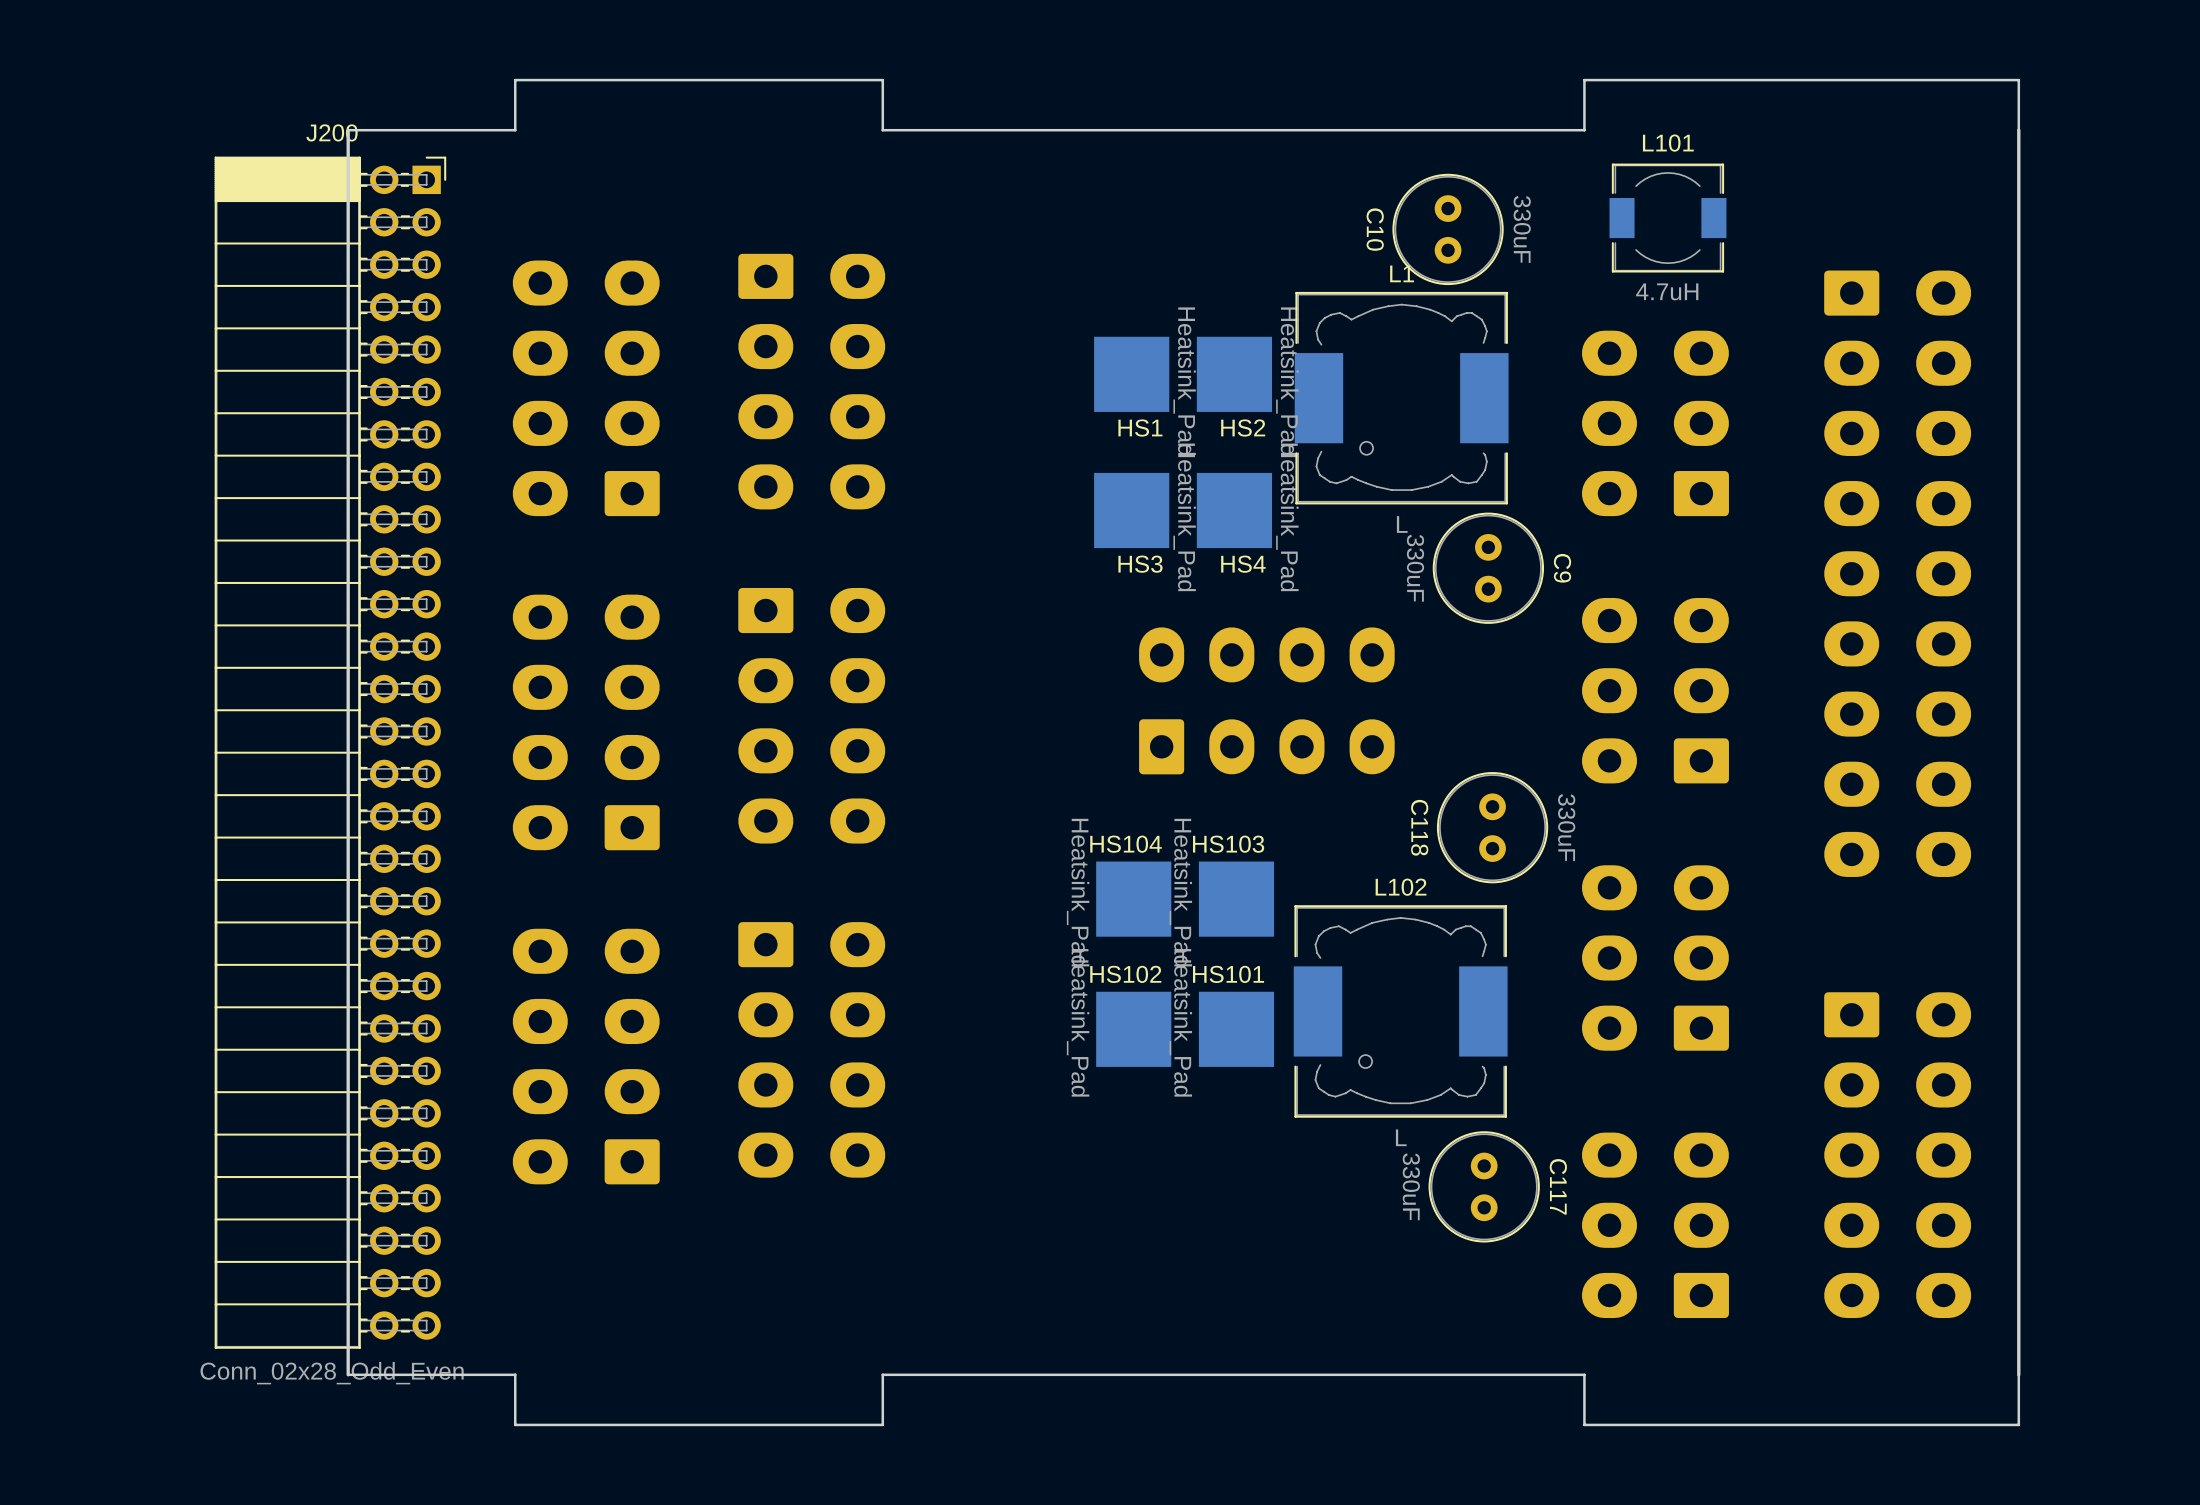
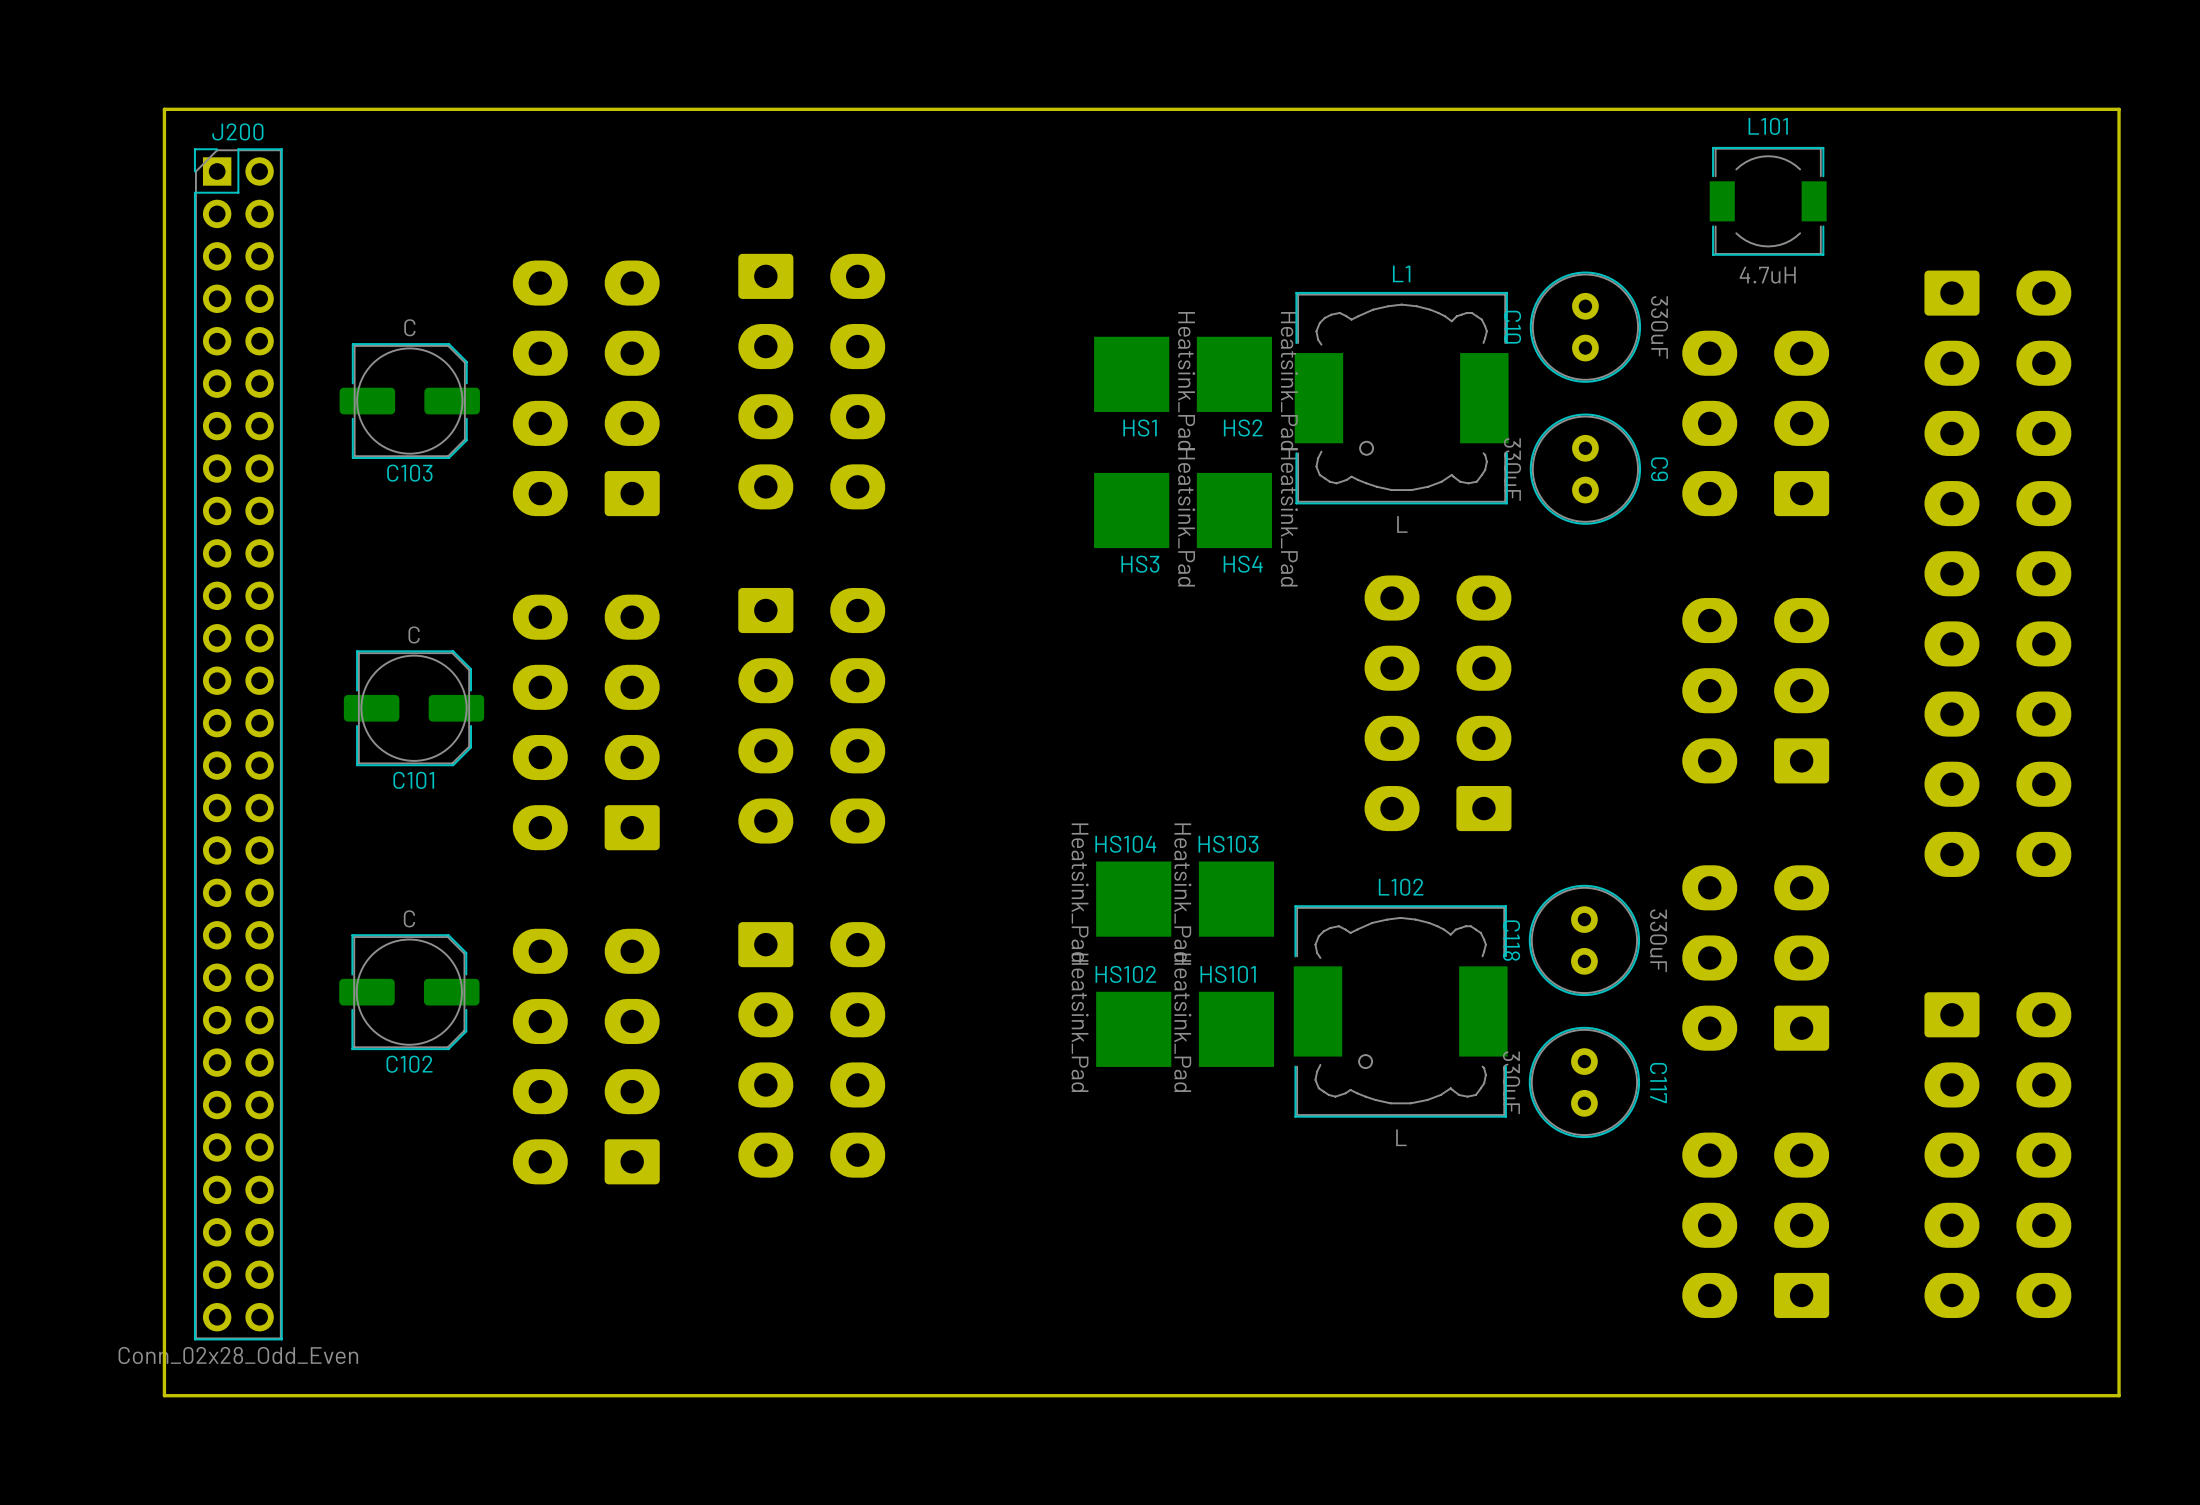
board edge: (2018, 80) (2018, 1424) (1584, 1424) (1584, 1374) (882, 1374) (882, 1424) (515, 1424) (515, 1374) (348, 1374) (348, 130) (515, 130) (515, 80) (882, 80) (882, 130) (1584, 130) (1584, 80) (2018, 80) -> (2119, 109) (2119, 1395) (164, 1395) (164, 109) (2119, 109)
J200 footprint: [214, 156, 447, 1349] -> [193, 148, 283, 1341]
L101 position: (1667, 218) -> (1768, 201)
C10 position: (1448, 229) -> (1585, 327)
C103: none -> C (409, 401)
part position: (1655, 423) -> (1755, 423)
C9 position: (1488, 568) -> (1585, 469)
part position: (1897, 573) -> (1997, 573)
part position: (1655, 690) -> (1755, 690)
part rotation: 0° (1266, 700) -> 90° counterclockwise (1437, 703)
part position: (1266, 700) -> (1437, 703)
C101: none -> C (414, 708)
C118 position: (1492, 827) -> (1584, 940)
part position: (1655, 957) -> (1755, 957)
C102: none -> C (409, 992)
part position: (1897, 1155) -> (1997, 1155)
C117 position: (1484, 1186) -> (1584, 1082)
part position: (1655, 1225) -> (1755, 1225)

